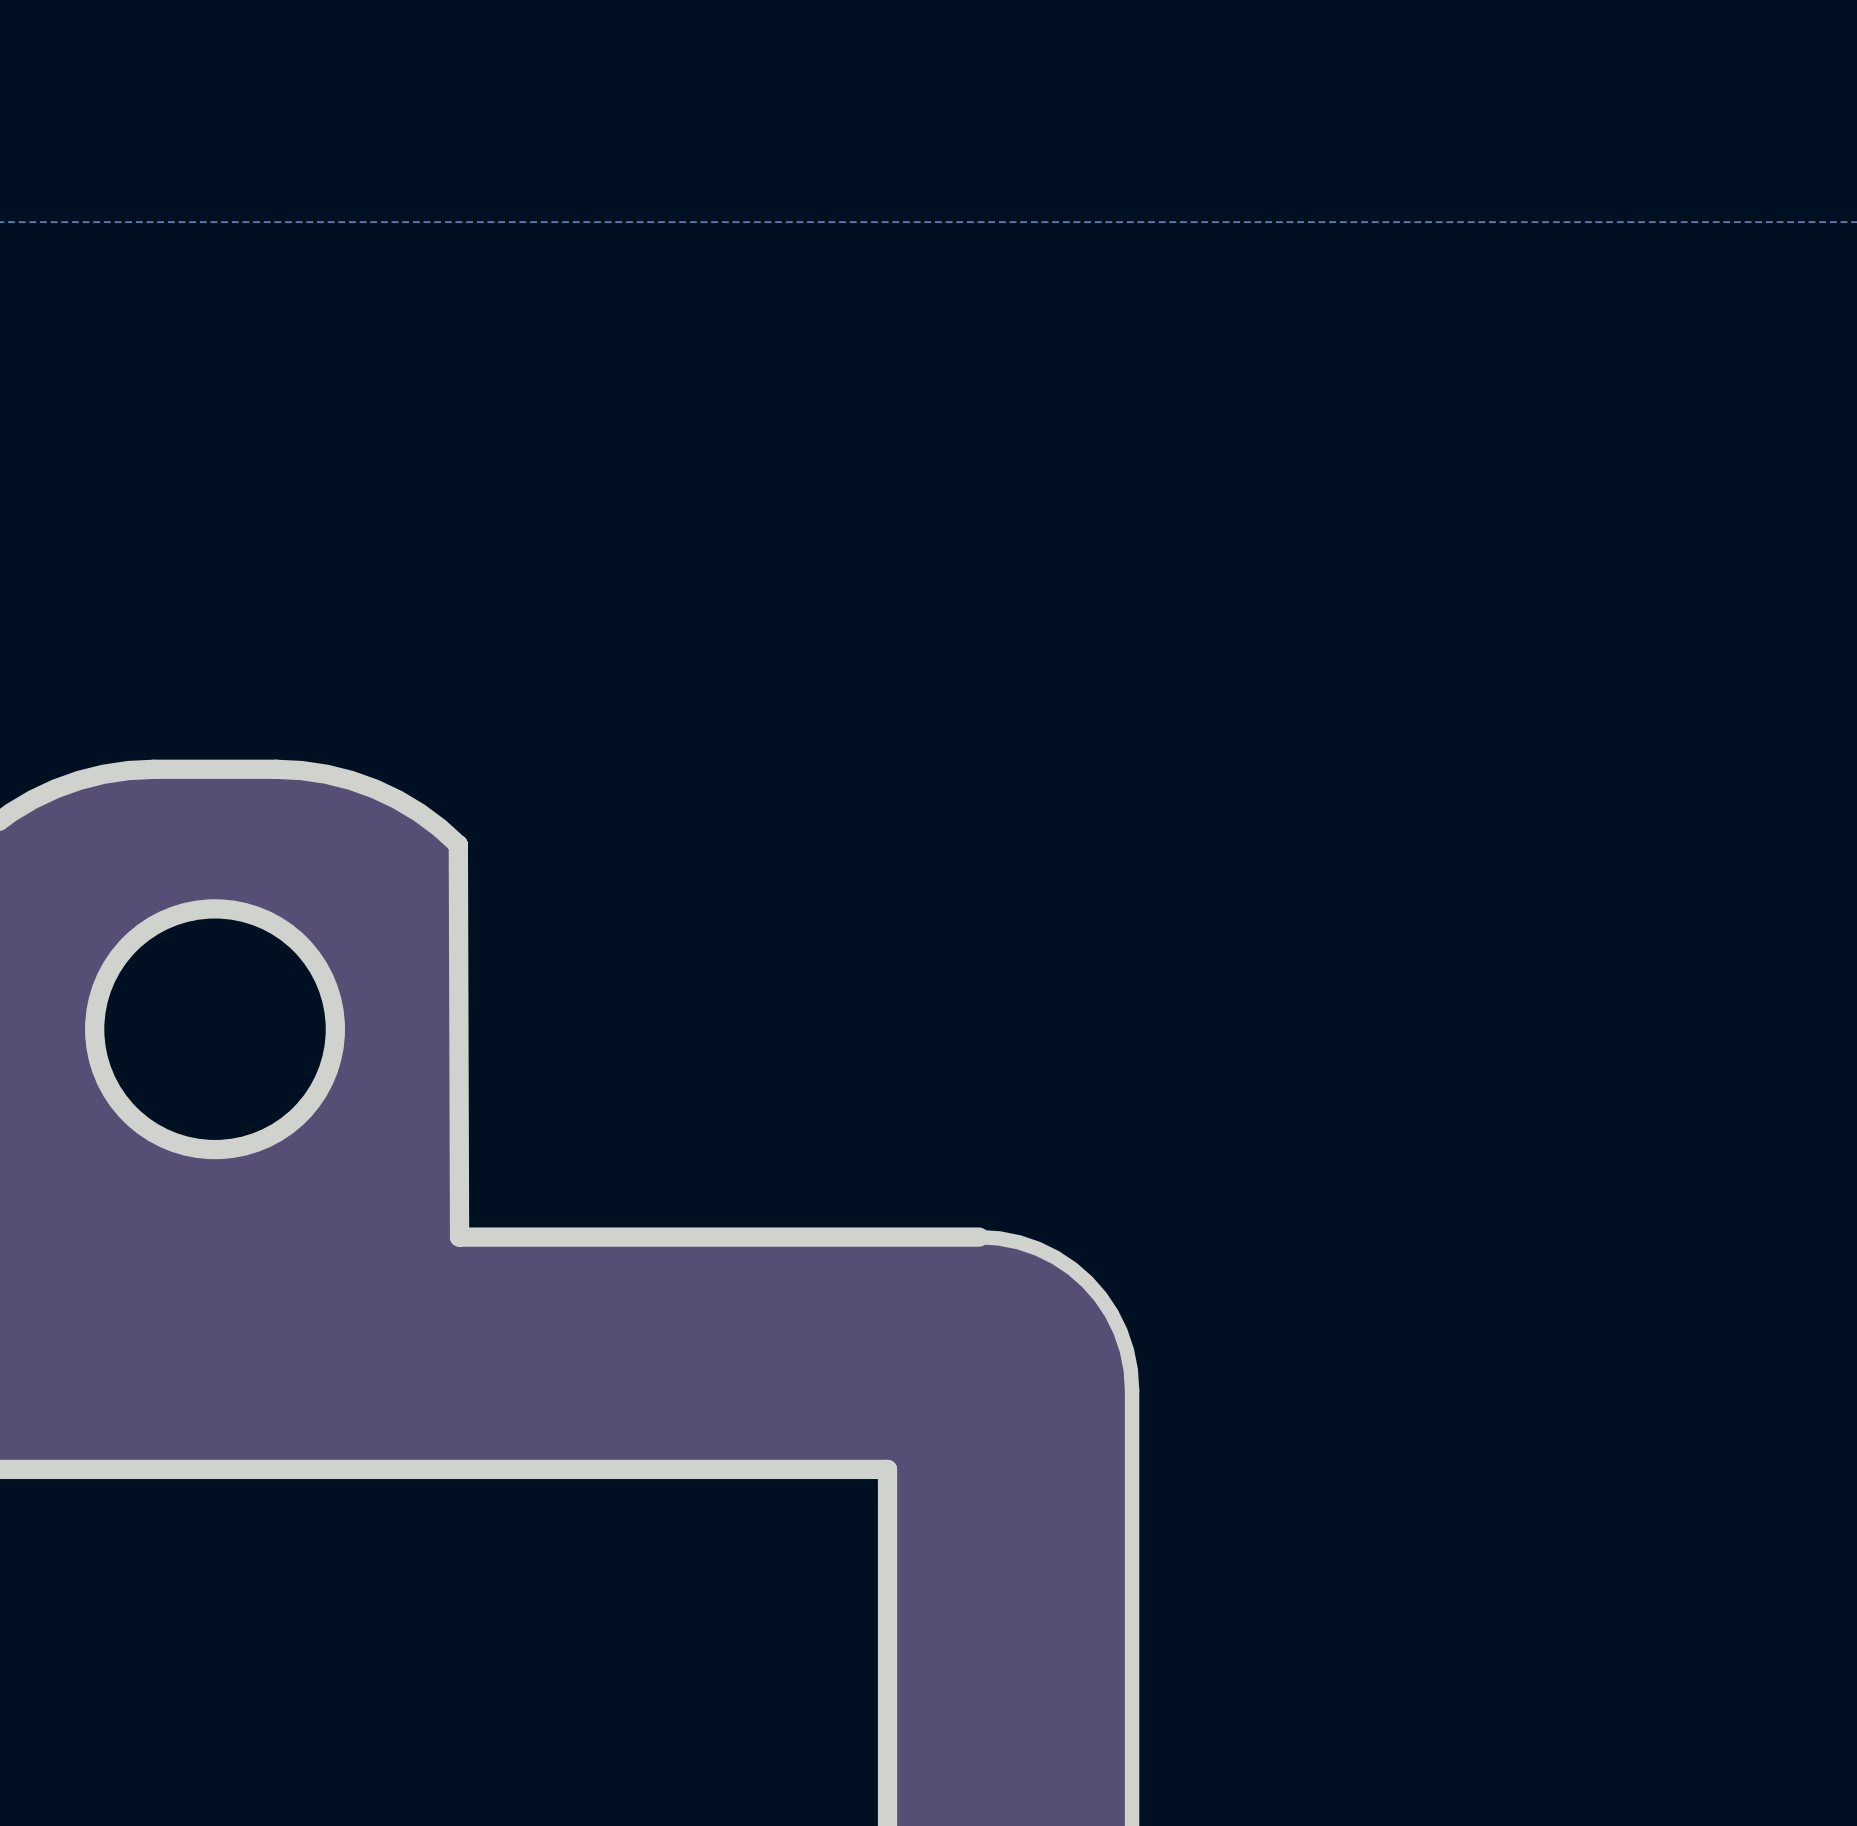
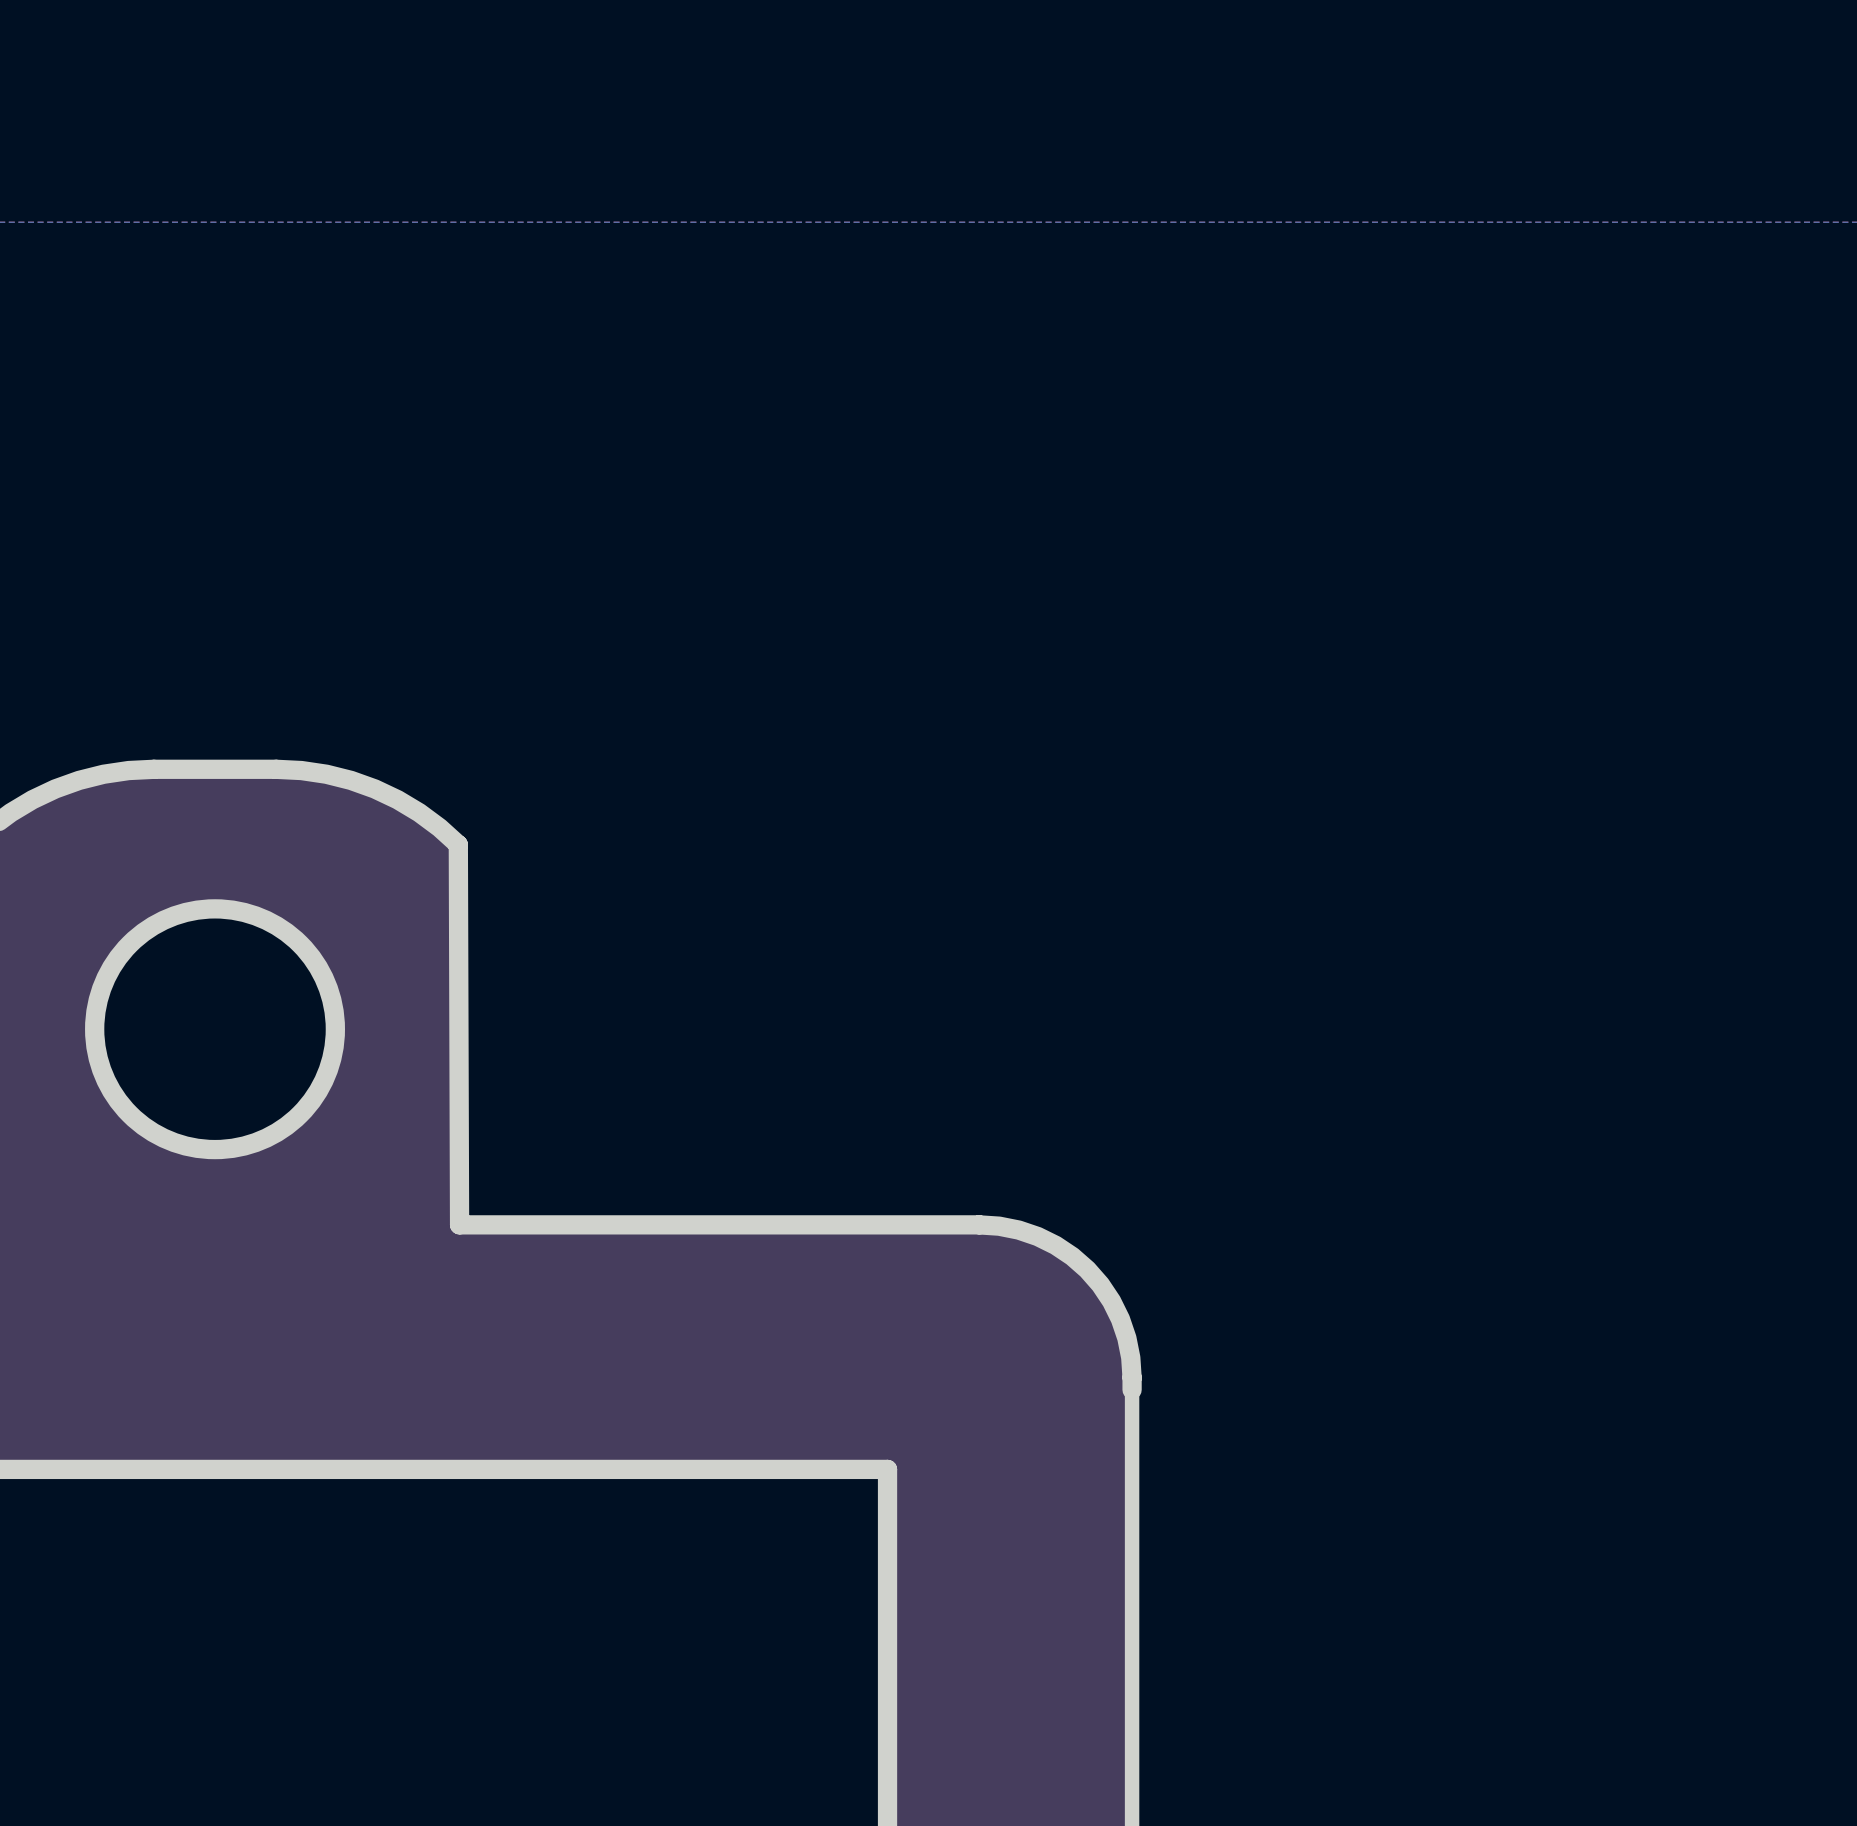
board edge: (459, 1224) (459, 1237) (979, 1237) (1018, 1242) (1037, 1248) (1072, 1268) (1100, 1296) (1120, 1331) (1126, 1350) (1132, 1389) -> (459, 1224) (979, 1224) (1018, 1230) (1055, 1245) (1087, 1269) (1100, 1284) (1120, 1319) (1126, 1338) (1130, 1357) (1132, 1389)

